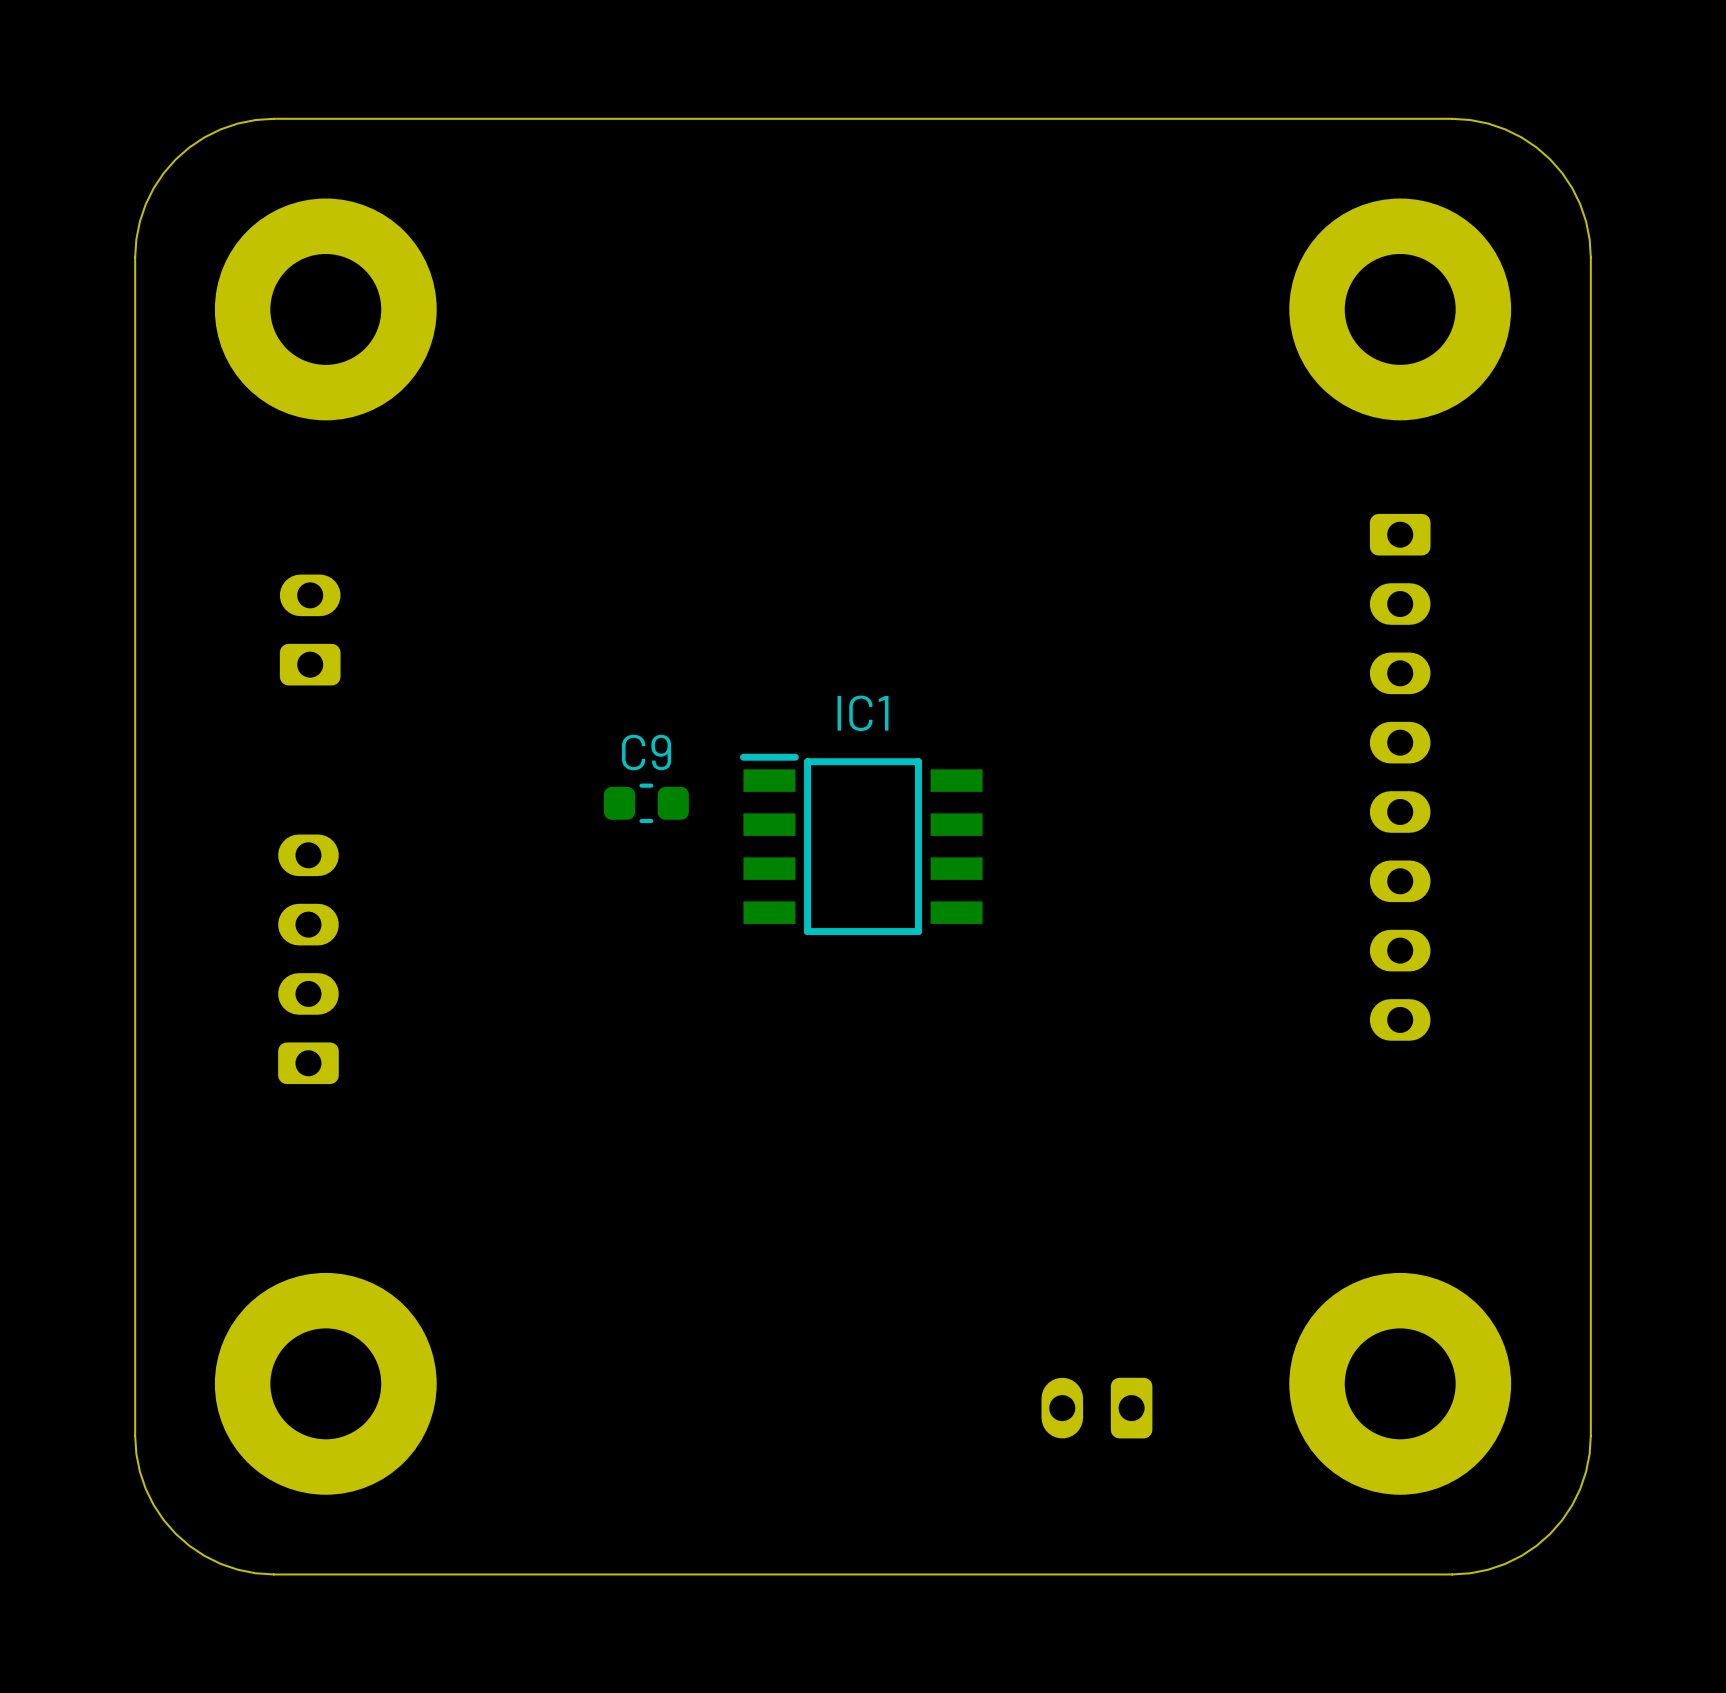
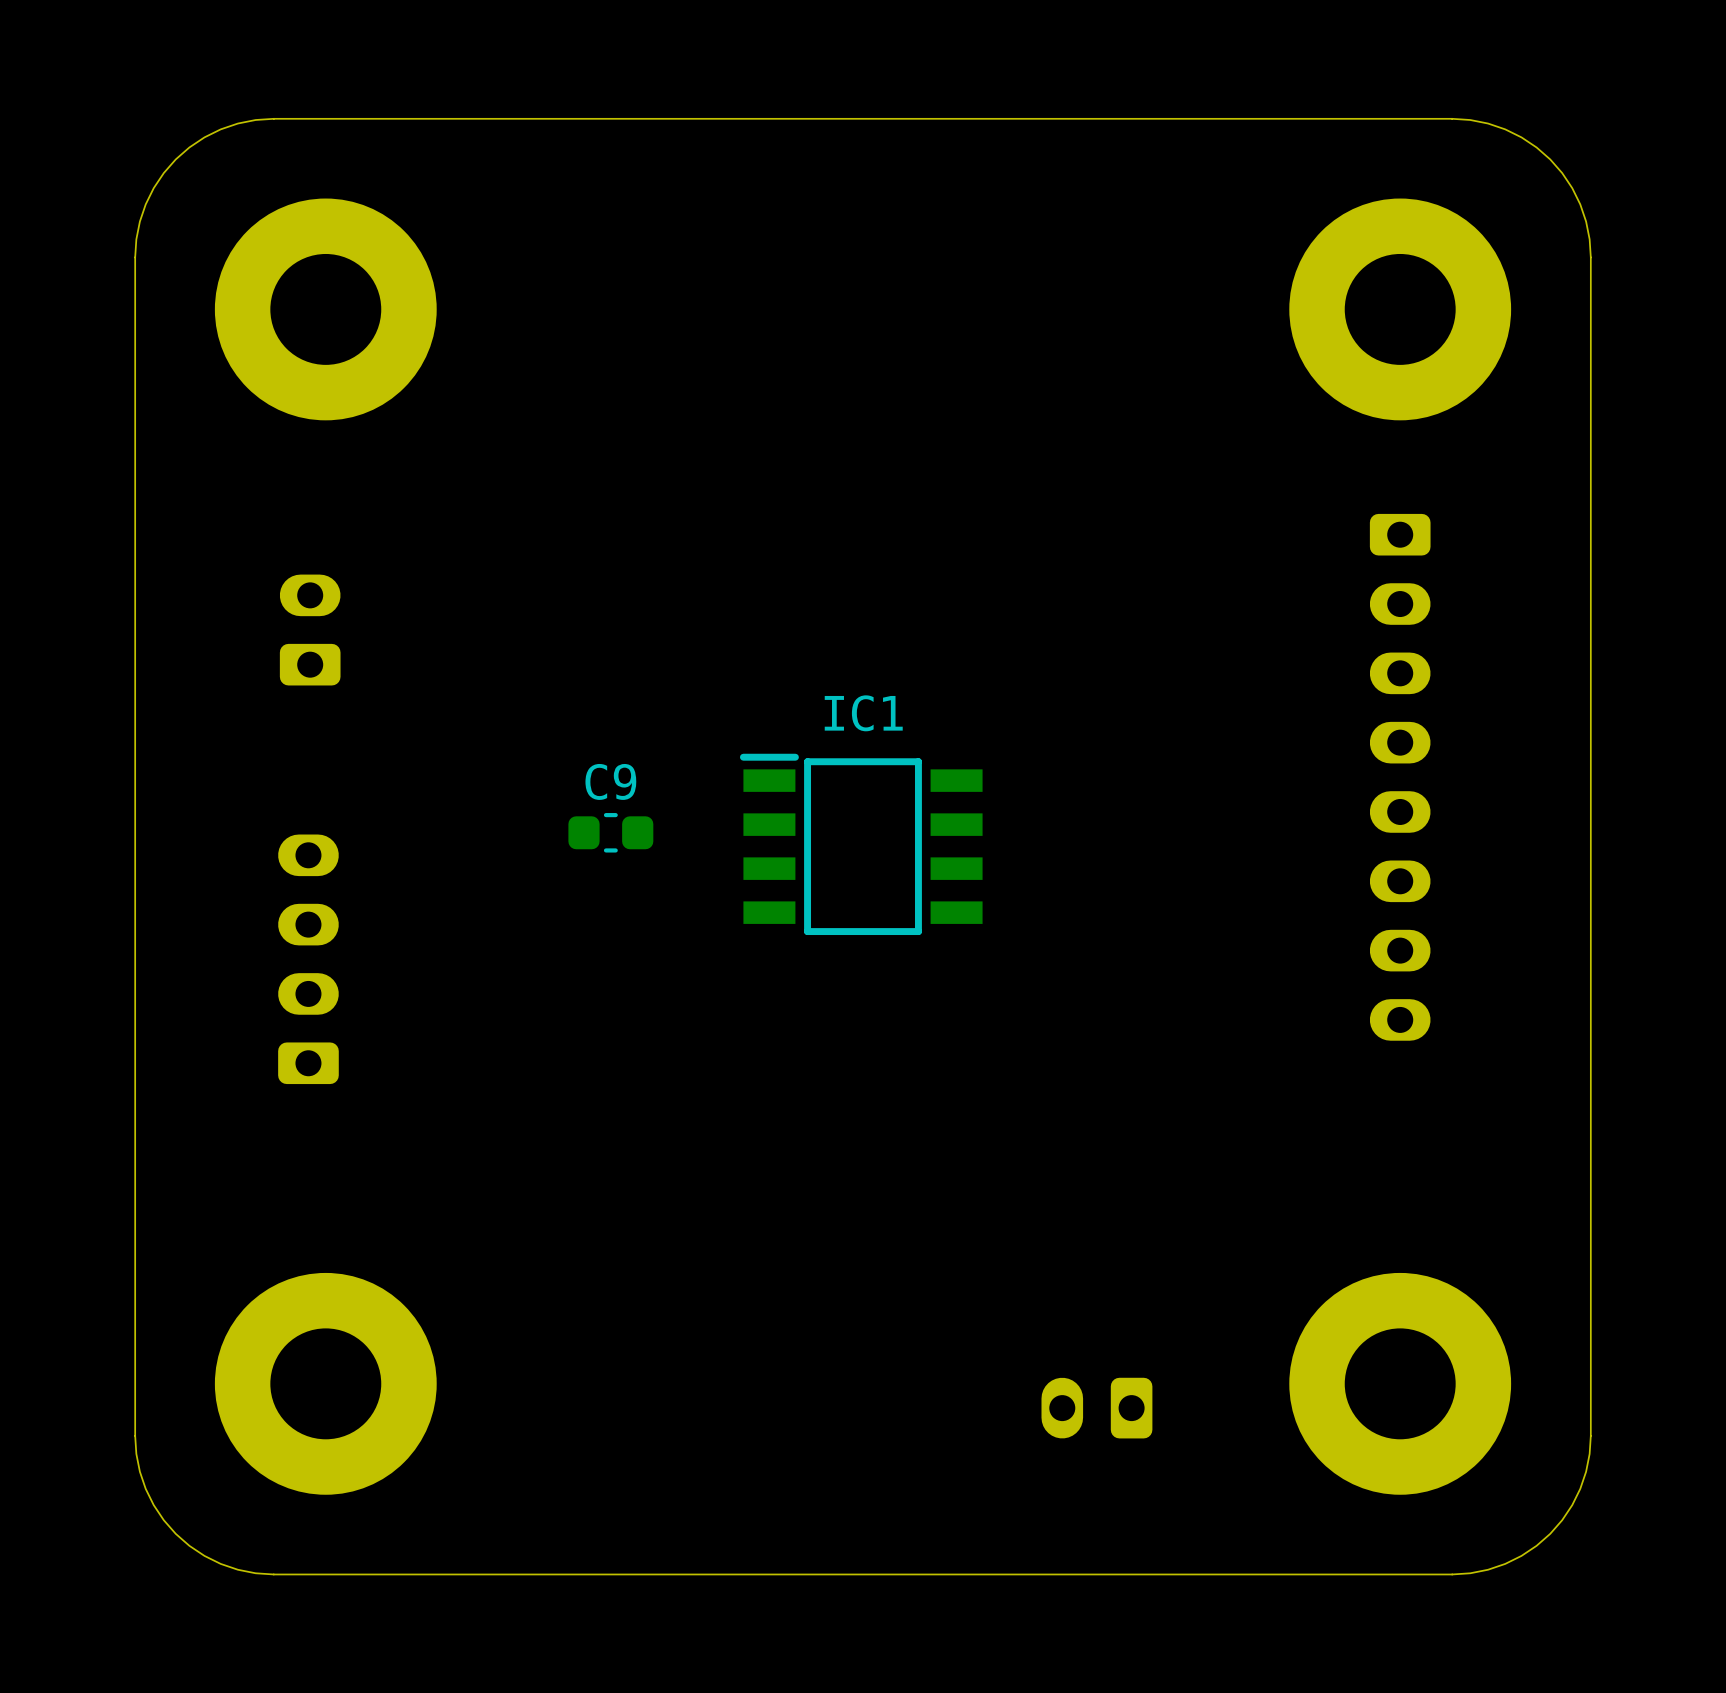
C9 position: (646, 803) -> (610, 832)

